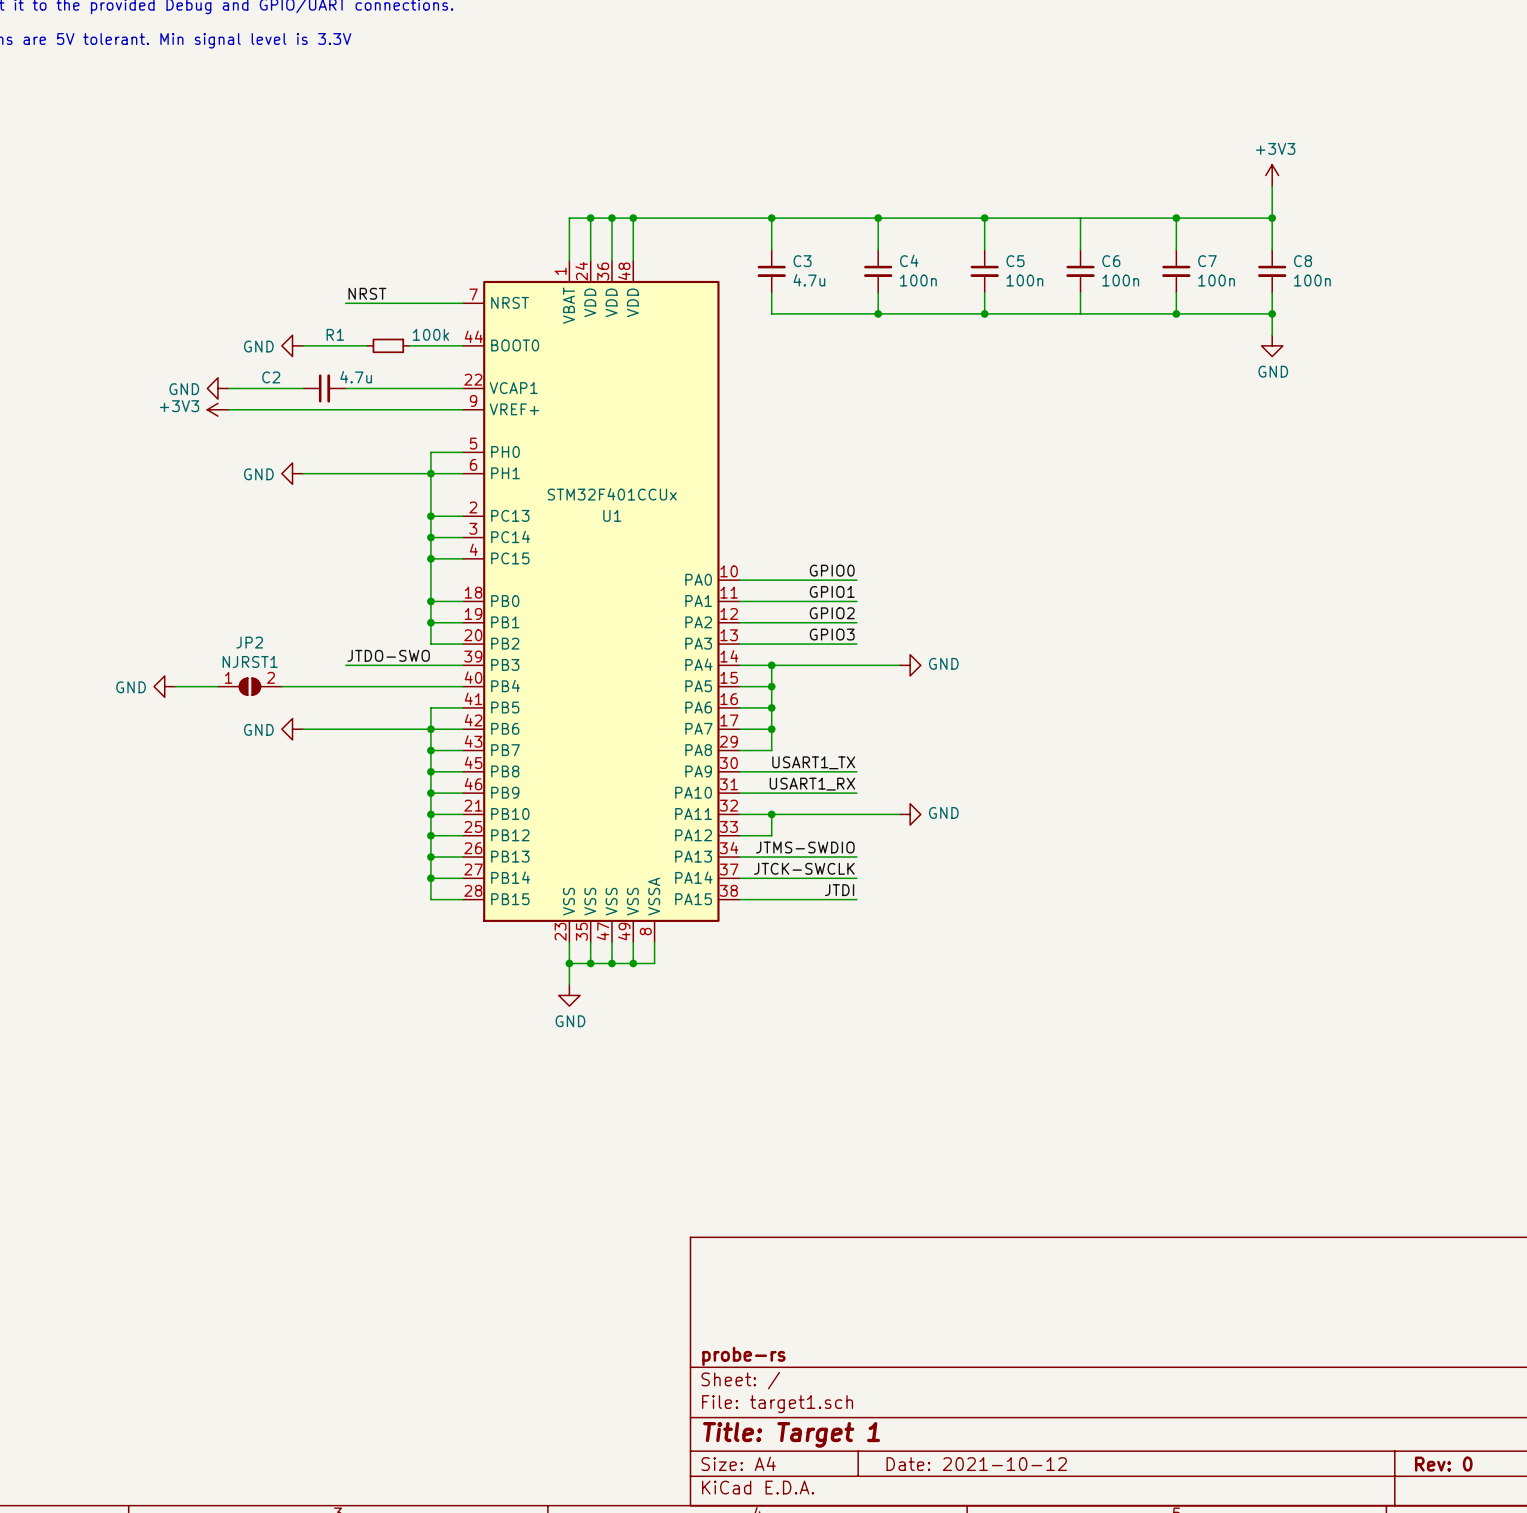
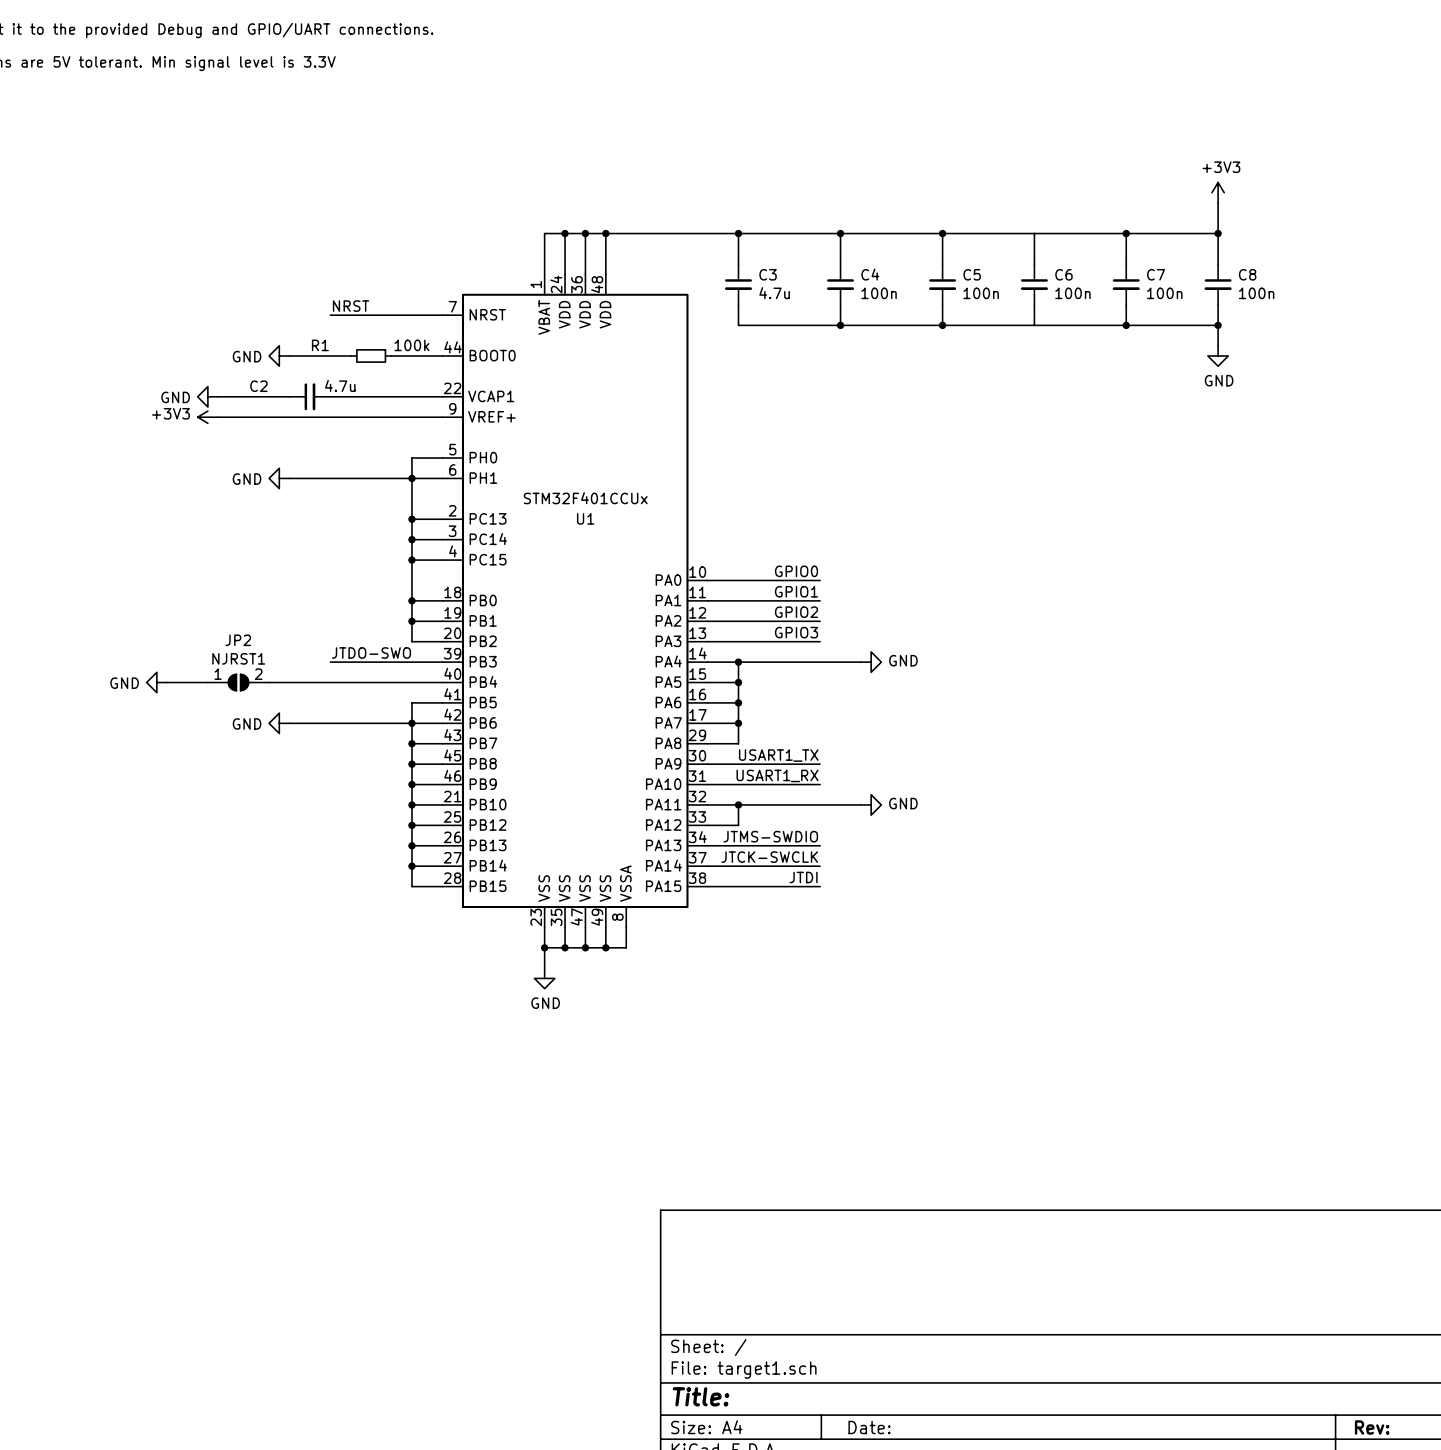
title block: probe-rs (743, 1356) -> none
title block: Title: Target 1 (791, 1434) -> Title: (701, 1396)
title block: Date: 2021-10-12 (976, 1464) -> Date: (869, 1427)
title block: Rev: 0 (1443, 1464) -> Rev: (1372, 1427)

